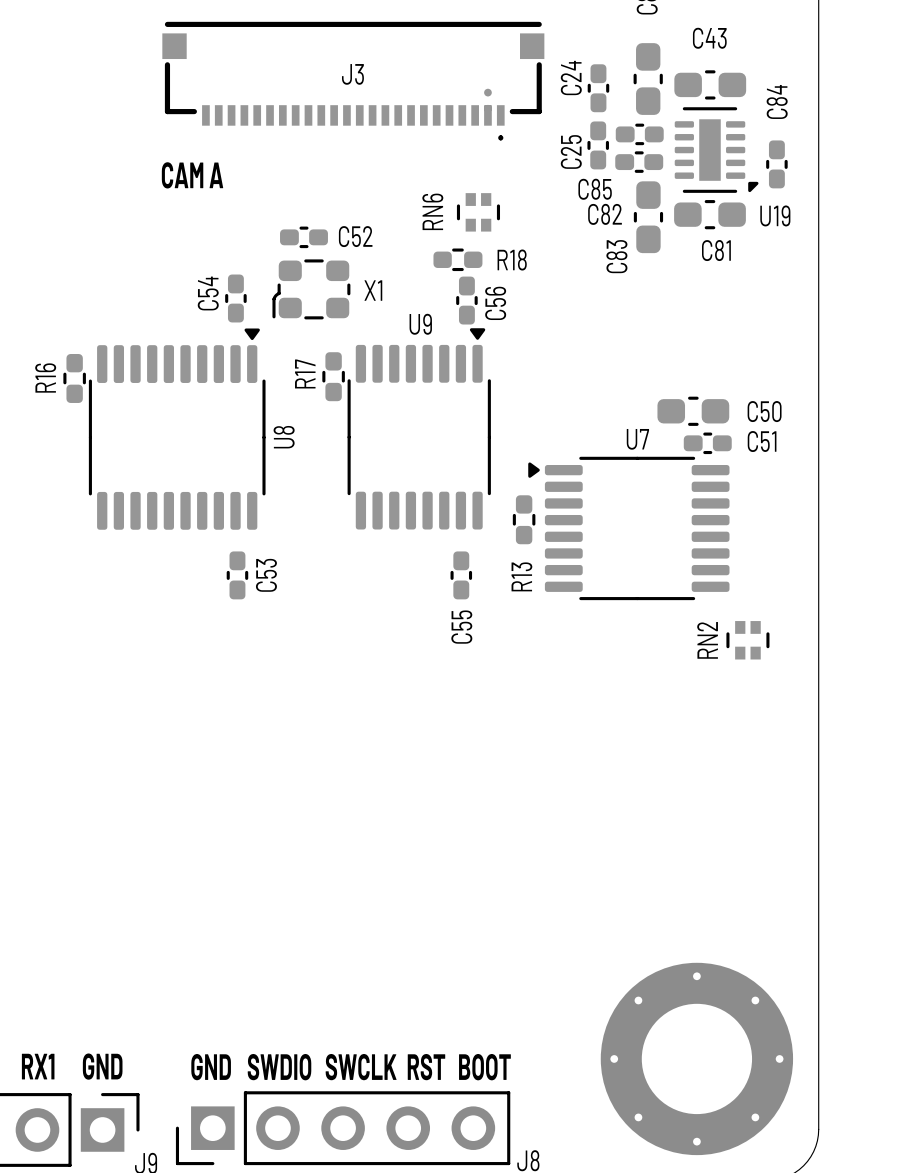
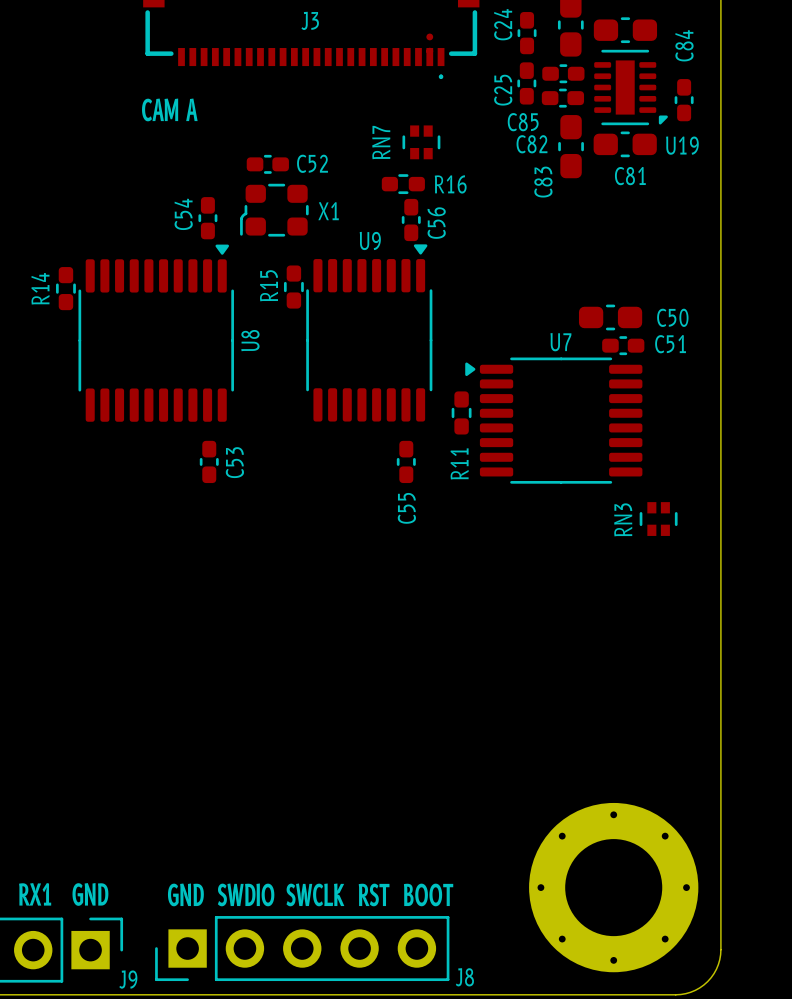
RN6 name: RN6 (432, 211) -> RN7 (381, 142)
R18 name: R18 (512, 260) -> R16 (450, 184)
R17 name: R17 (305, 373) -> R15 (268, 285)
R16 name: R16 (45, 378) -> R14 (40, 288)
R13 name: R13 (521, 576) -> R11 (459, 463)
RN2 name: RN2 (707, 640) -> RN3 (623, 519)

